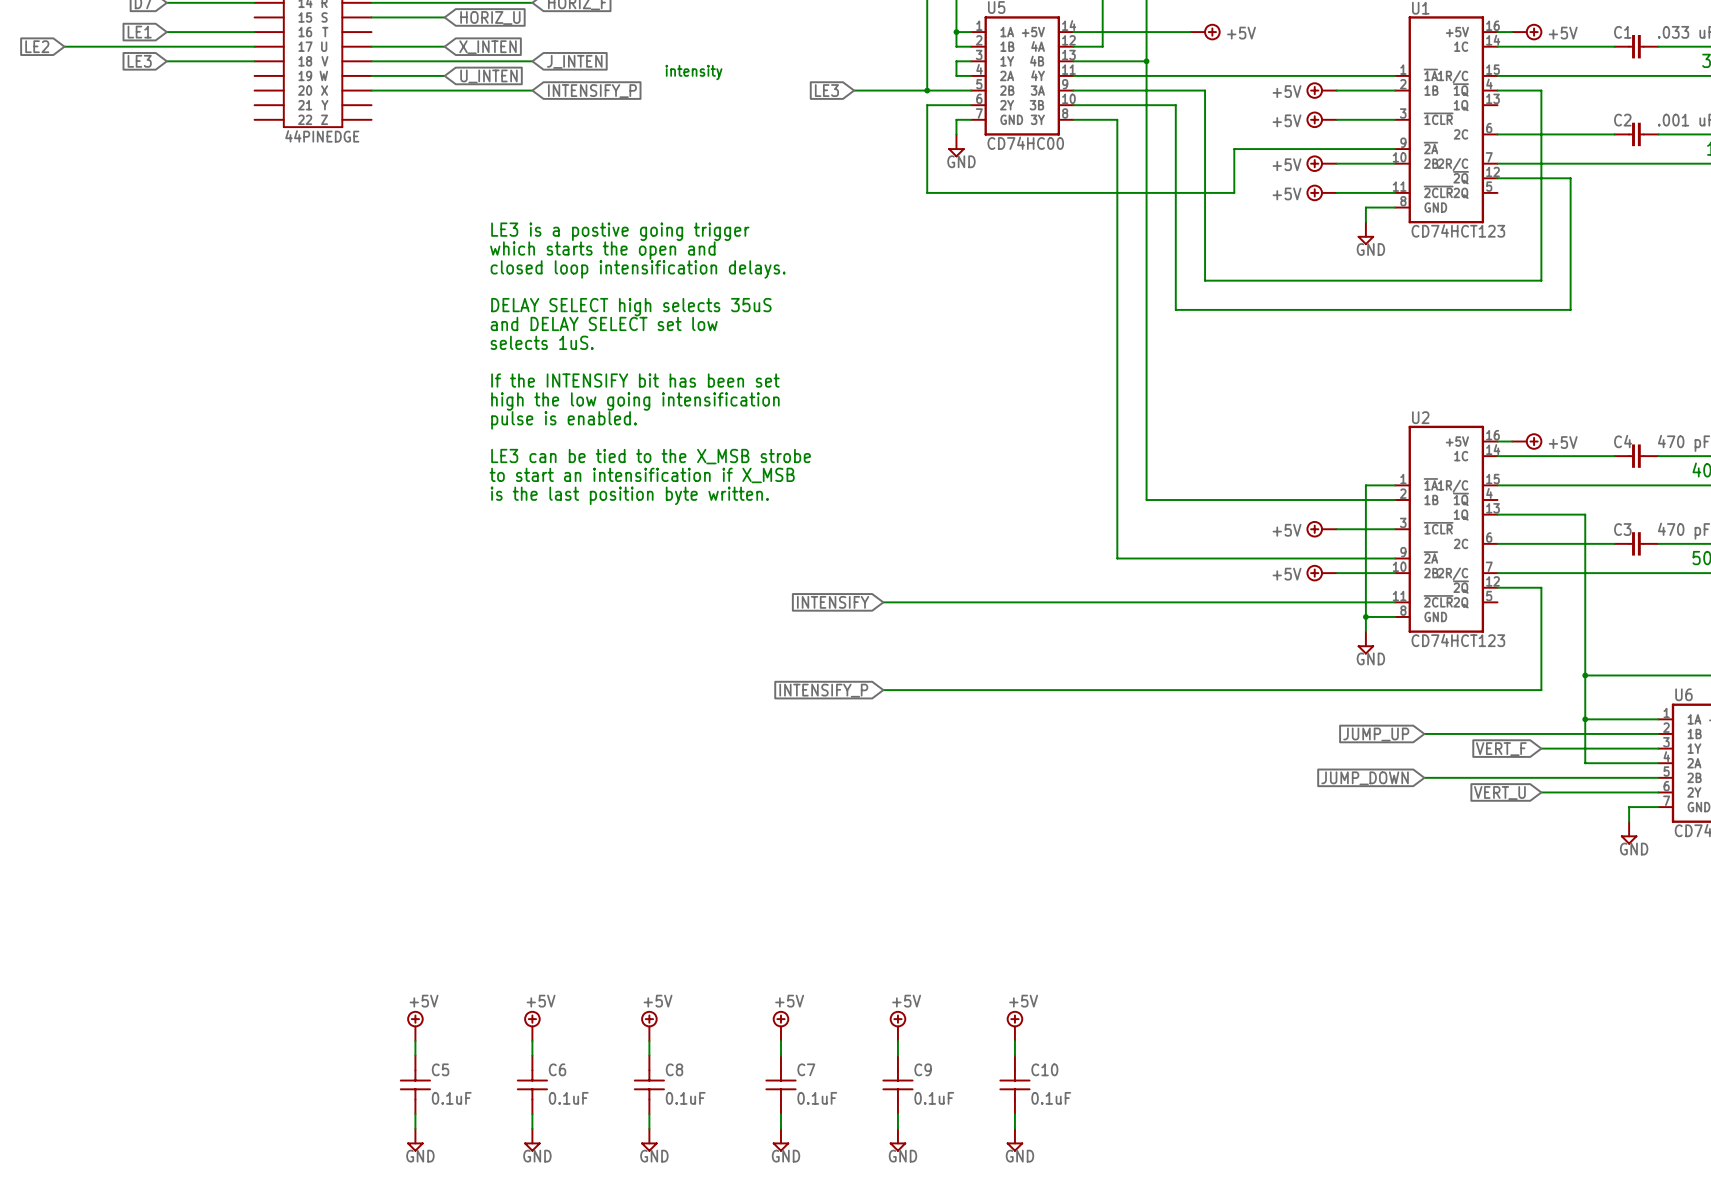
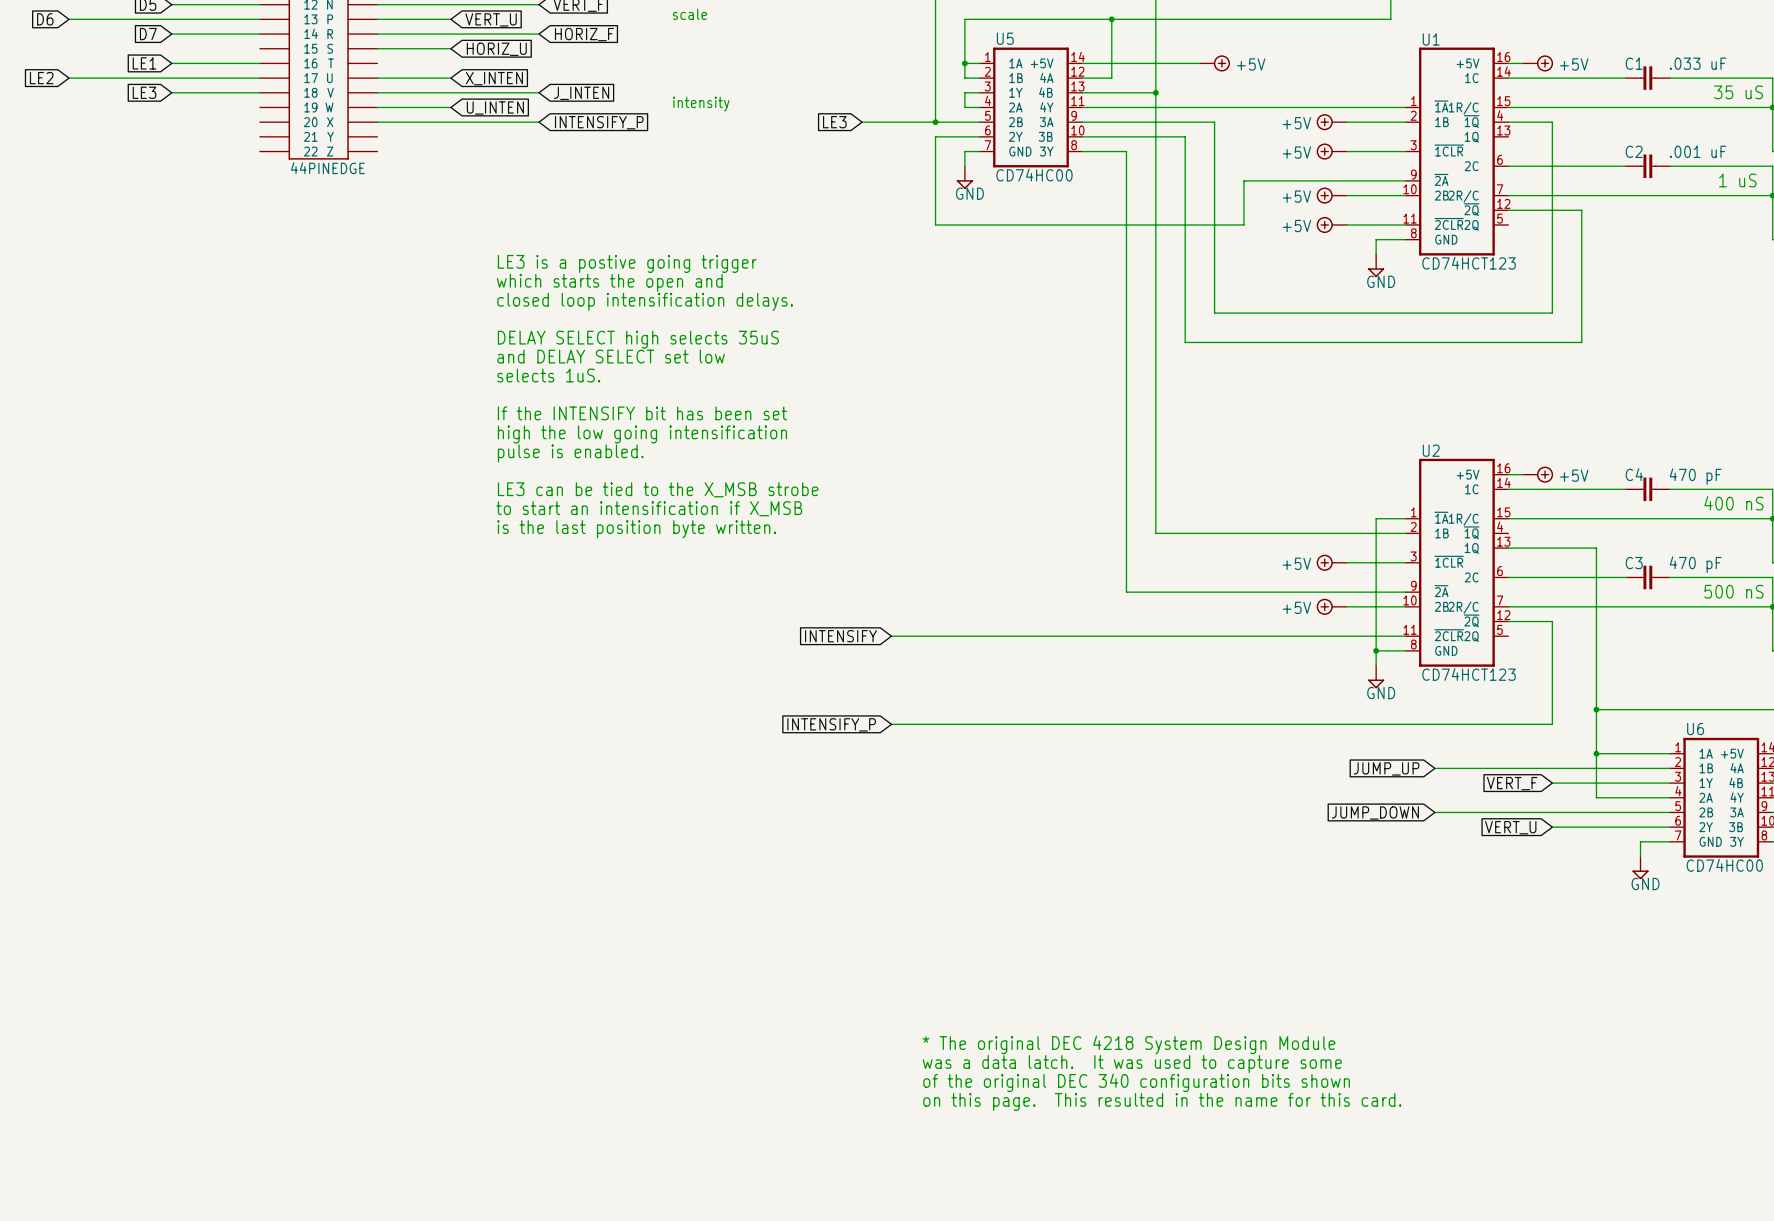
text: none -> * The original DEC 4218 System Design Module (1129, 1044)
power symbol: +5V (415, 1026) -> none
power symbol: +5V (532, 1026) -> none
power symbol: +5V (649, 1026) -> none
power symbol: +5V (780, 1026) -> none
power symbol: +5V (897, 1026) -> none
power symbol: +5V (1014, 1026) -> none
text: none -> was a data latch. It was used to capture some (1132, 1064)
wire: (415, 1041) (415, 1055) -> none
wire: (532, 1041) (532, 1055) -> none
wire: (649, 1041) (649, 1055) -> none
wire: (780, 1041) (780, 1055) -> none
wire: (897, 1041) (897, 1055) -> none
wire: (1014, 1041) (1014, 1055) -> none
text: none -> of the original DEC 340 configuration bits shown (1136, 1082)
text: none -> on this page. This resulted in the name for this card. (1162, 1101)
C5: 0.1uF (415, 1084) -> none
C6: 0.1uF (532, 1084) -> none
C8: 0.1uF (649, 1084) -> none
C7: 0.1uF (780, 1084) -> none
C9: 0.1uF (897, 1084) -> none
C10: 0.1uF (1014, 1084) -> none
wire: (415, 1114) (415, 1128) -> none
wire: (532, 1114) (532, 1128) -> none
wire: (649, 1114) (649, 1128) -> none
wire: (780, 1114) (780, 1128) -> none
wire: (897, 1114) (897, 1128) -> none
wire: (1014, 1114) (1014, 1128) -> none
power symbol: GND (415, 1140) -> none
power symbol: GND (532, 1140) -> none
power symbol: GND (649, 1140) -> none
power symbol: GND (780, 1140) -> none
power symbol: GND (897, 1140) -> none
power symbol: GND (1014, 1140) -> none

